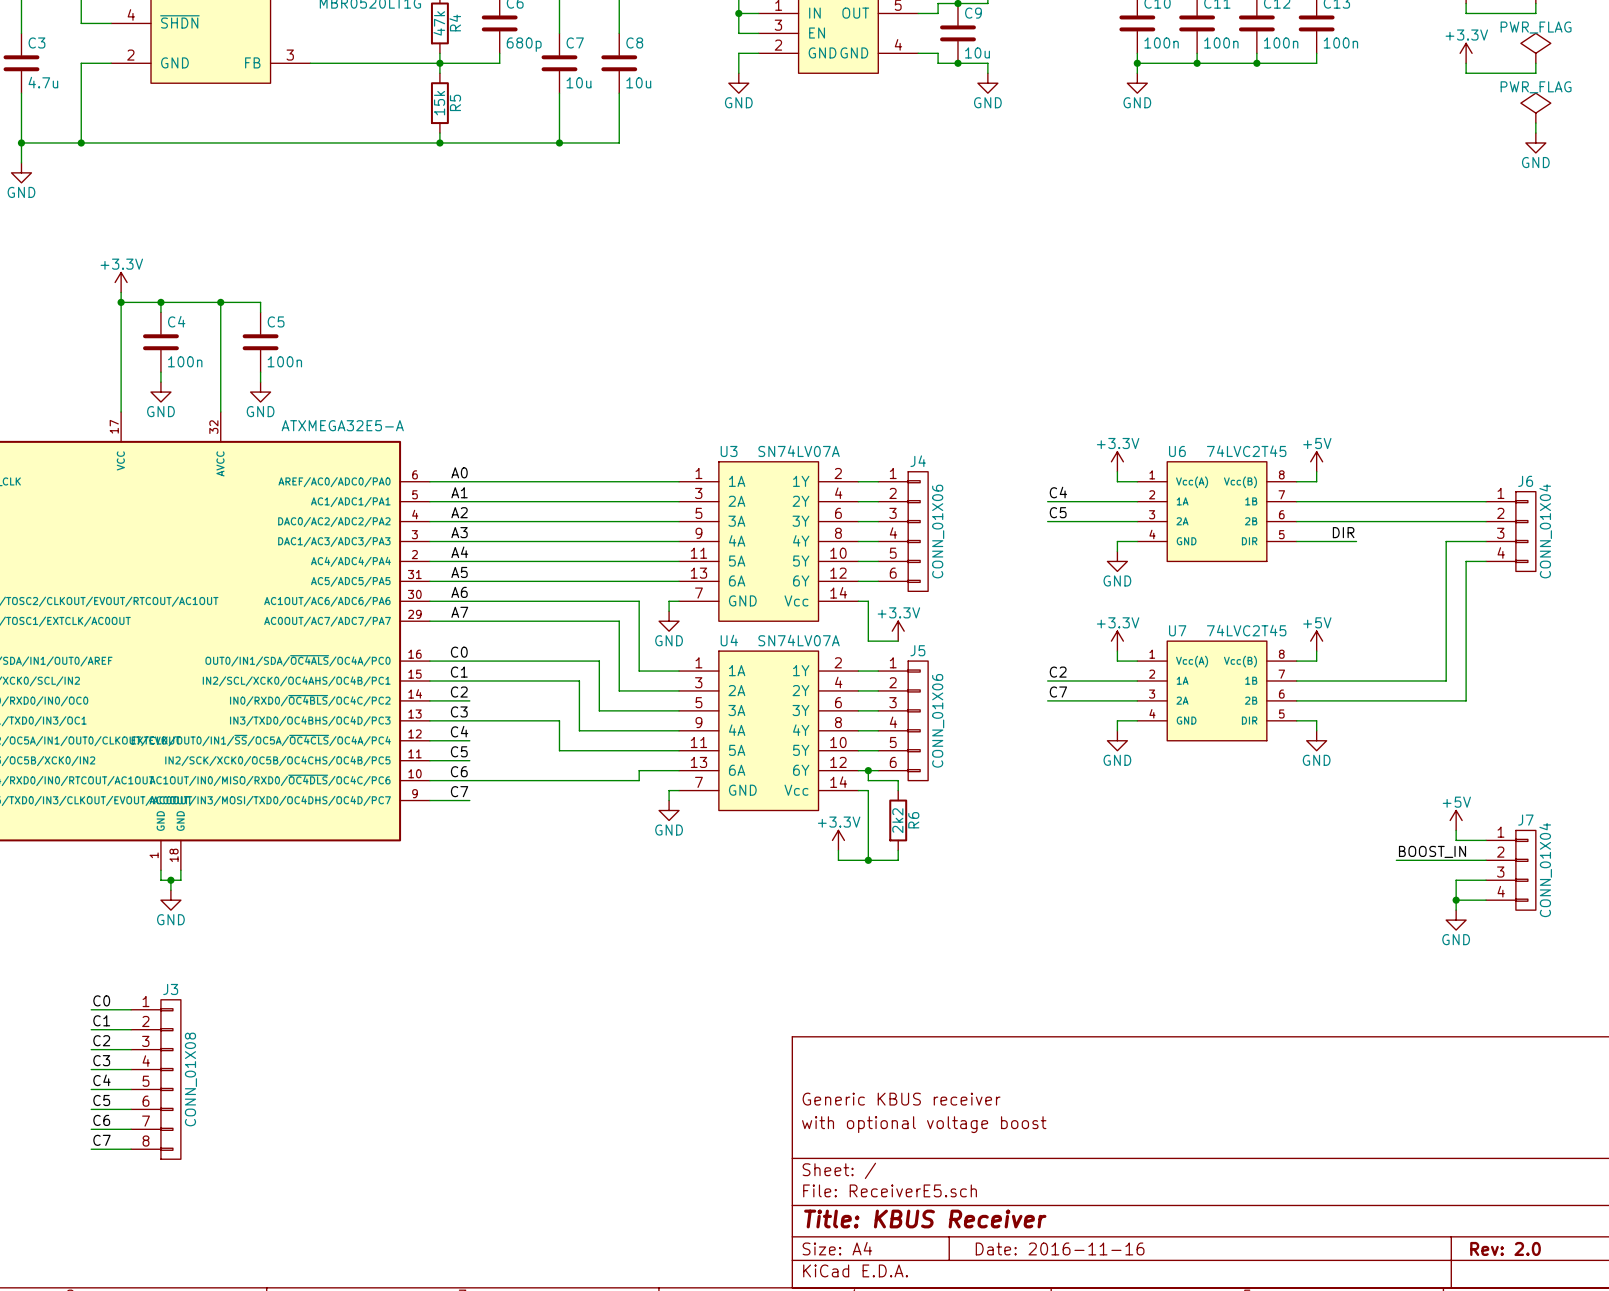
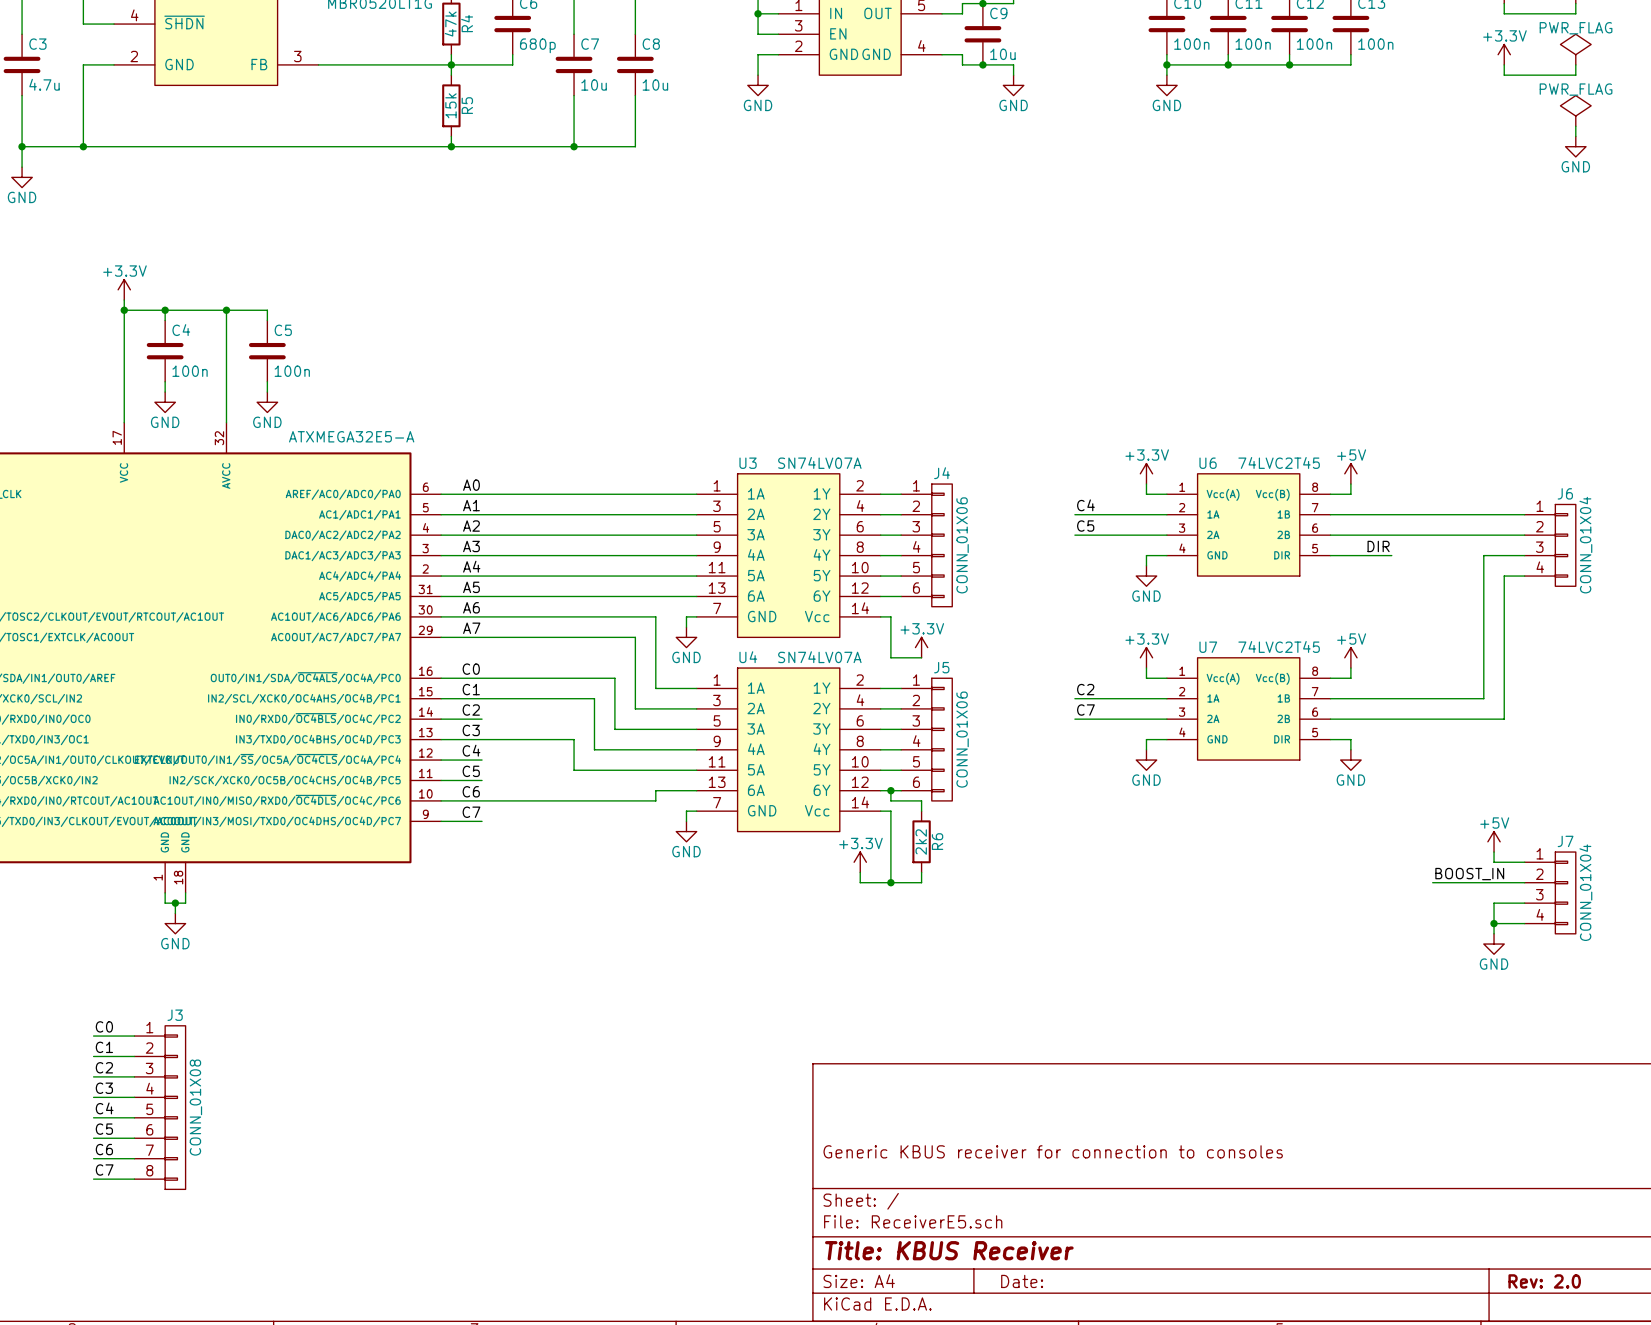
title block: Generic KBUS receiver (901, 1099) -> none
title block: with optional voltage boost (924, 1124) -> Generic KBUS receiver for connection to consoles (1053, 1151)
title block: Date: 2016-11-16 (1060, 1248) -> Date: (1022, 1281)

